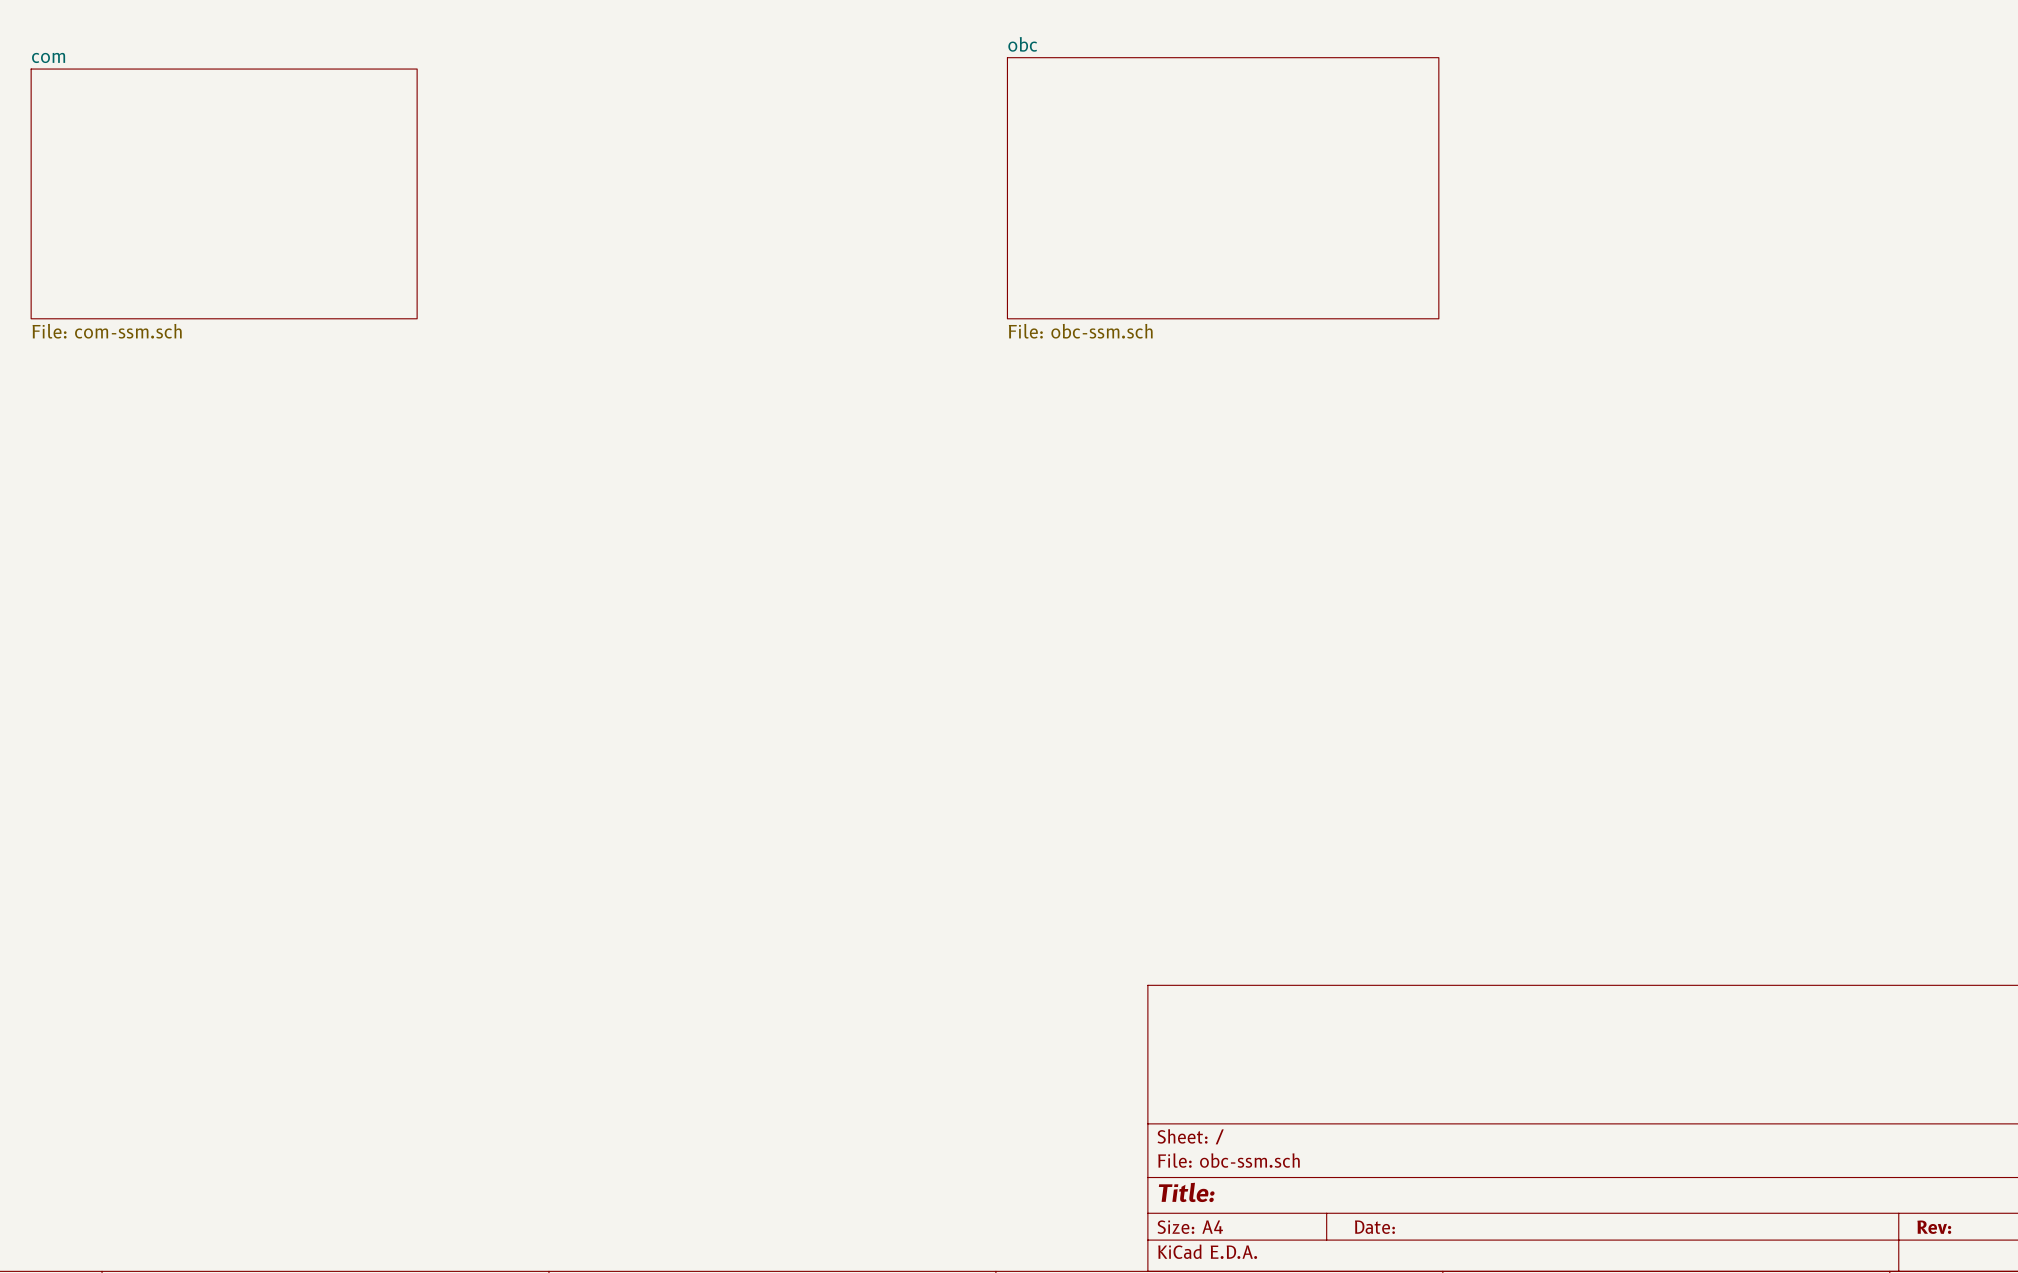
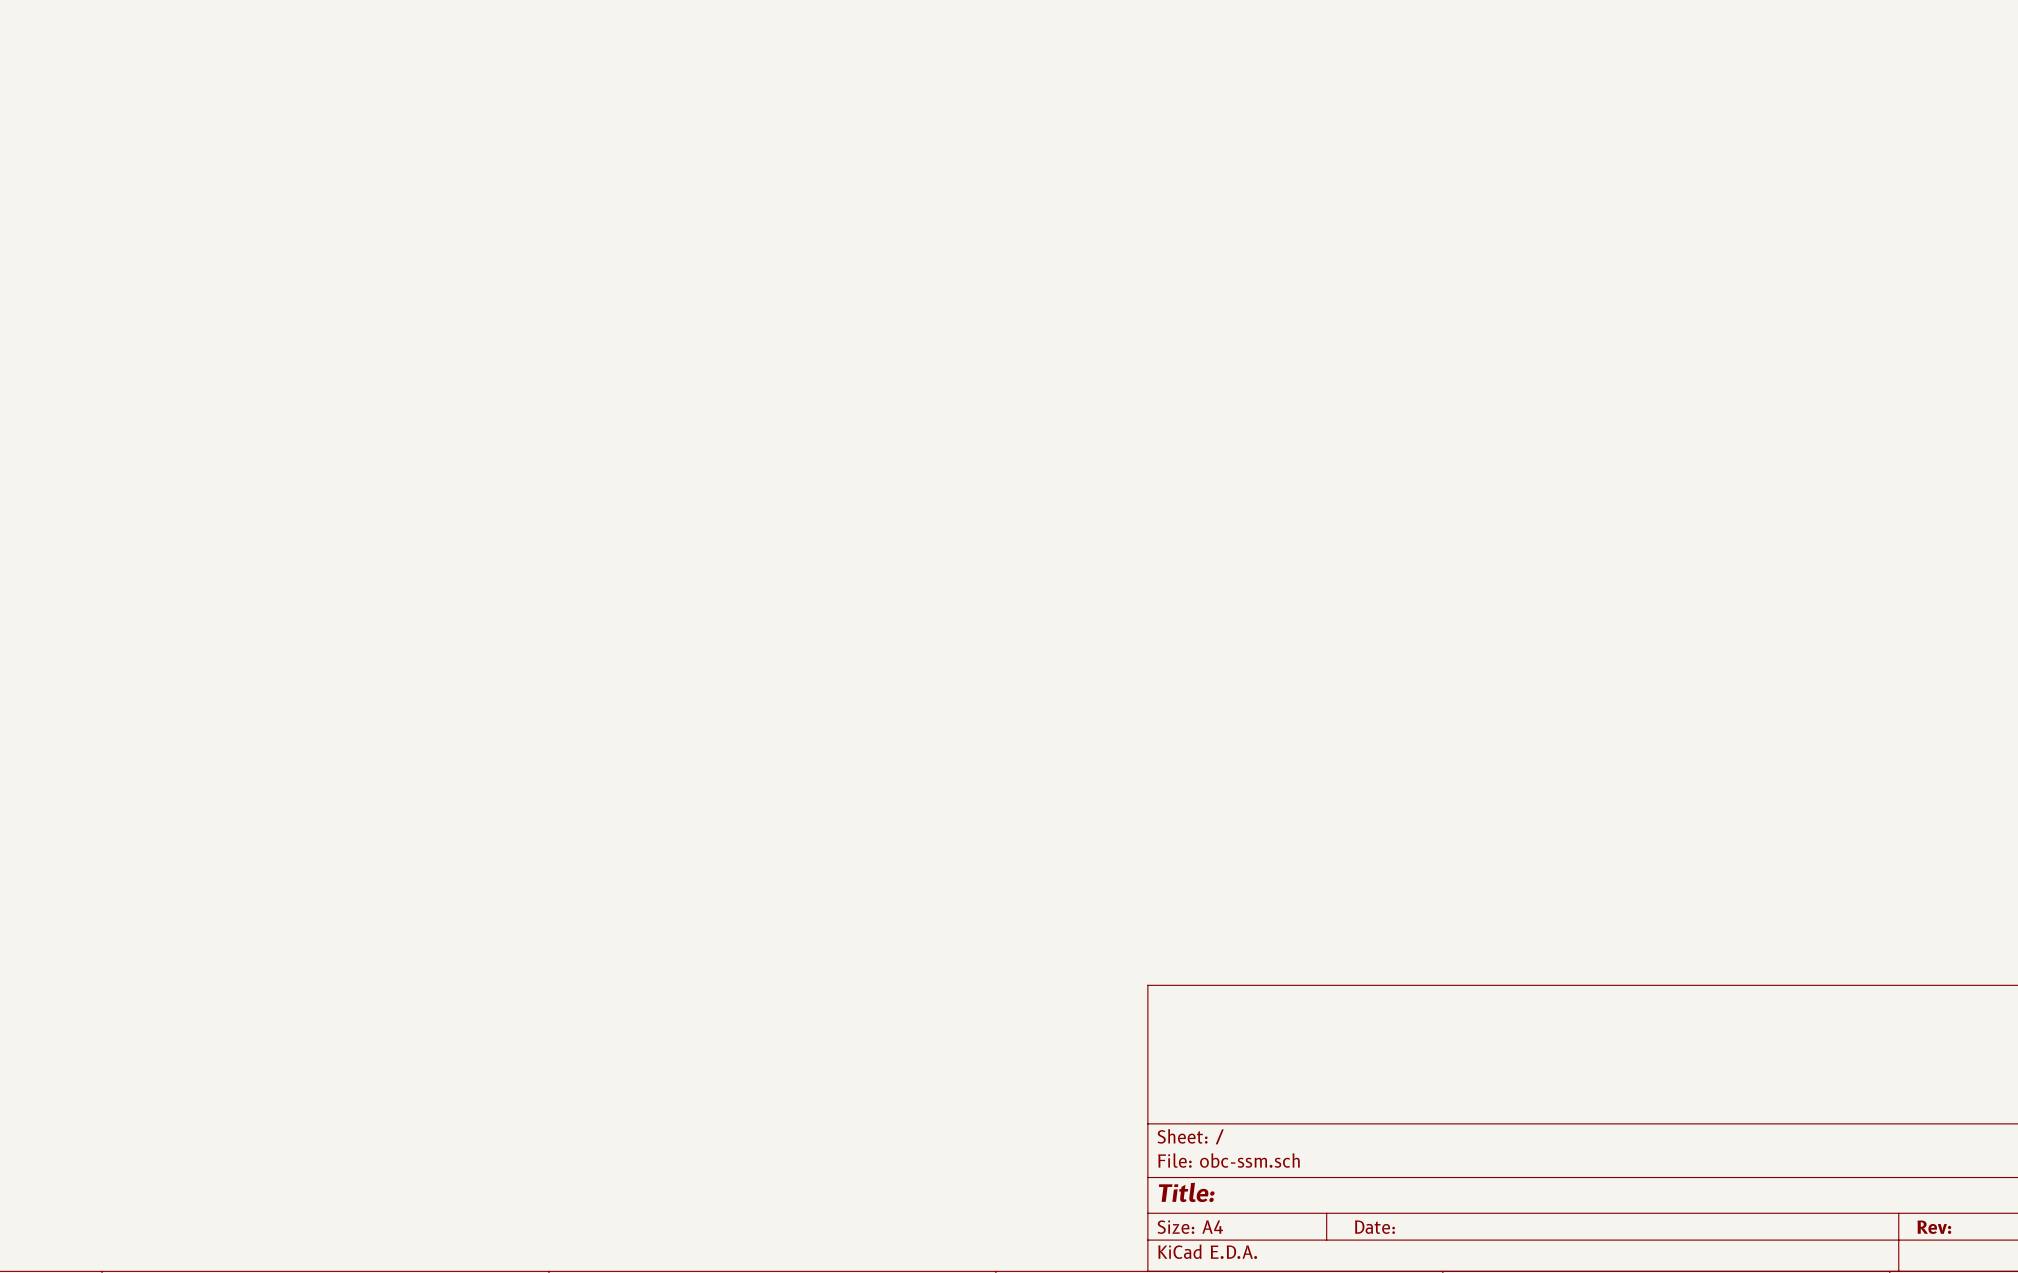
sheet obc: File: obc-ssm.sch (1223, 188) -> none
sheet com: File: com-ssm.sch (224, 193) -> none

